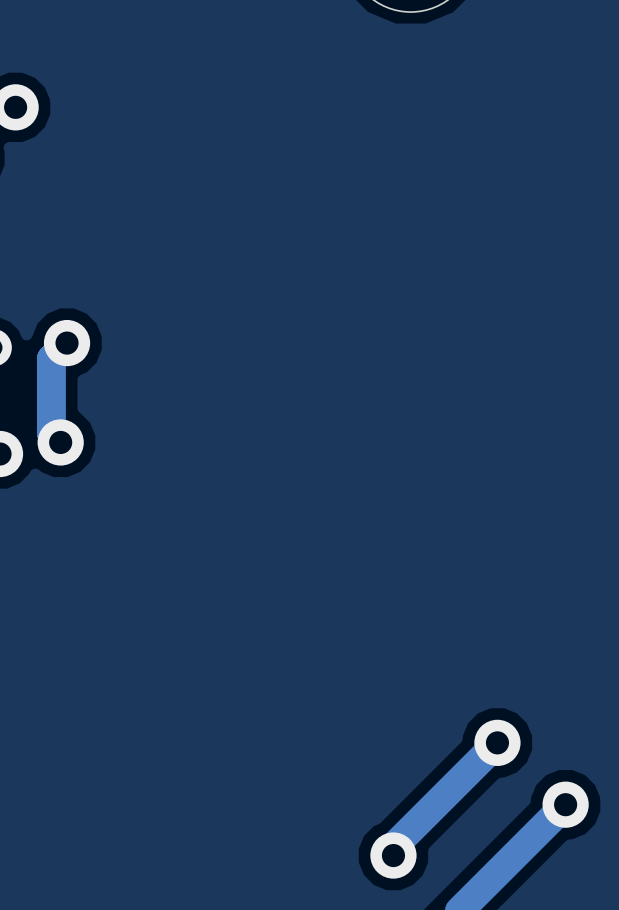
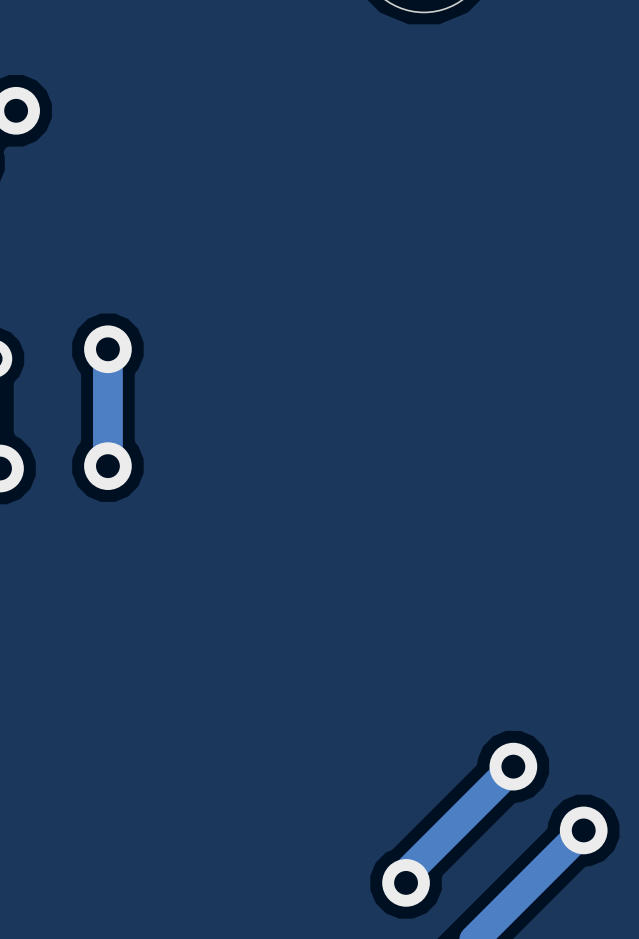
track: none -> (107, 349) (107, 466)
track: (67, 343) (51, 358) (51, 433) (60, 442) -> none
via position: (67, 343) -> (107, 349)
via position: (60, 442) -> (107, 466)

